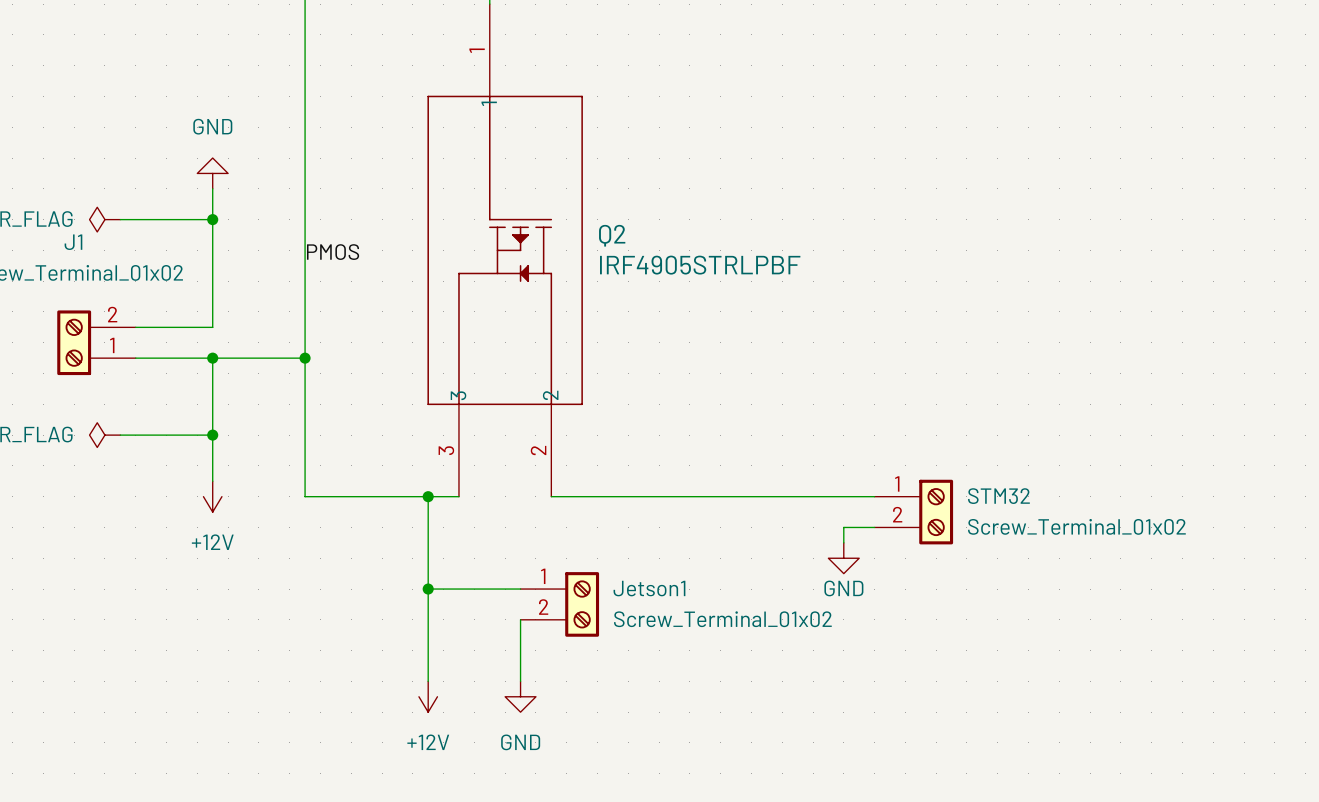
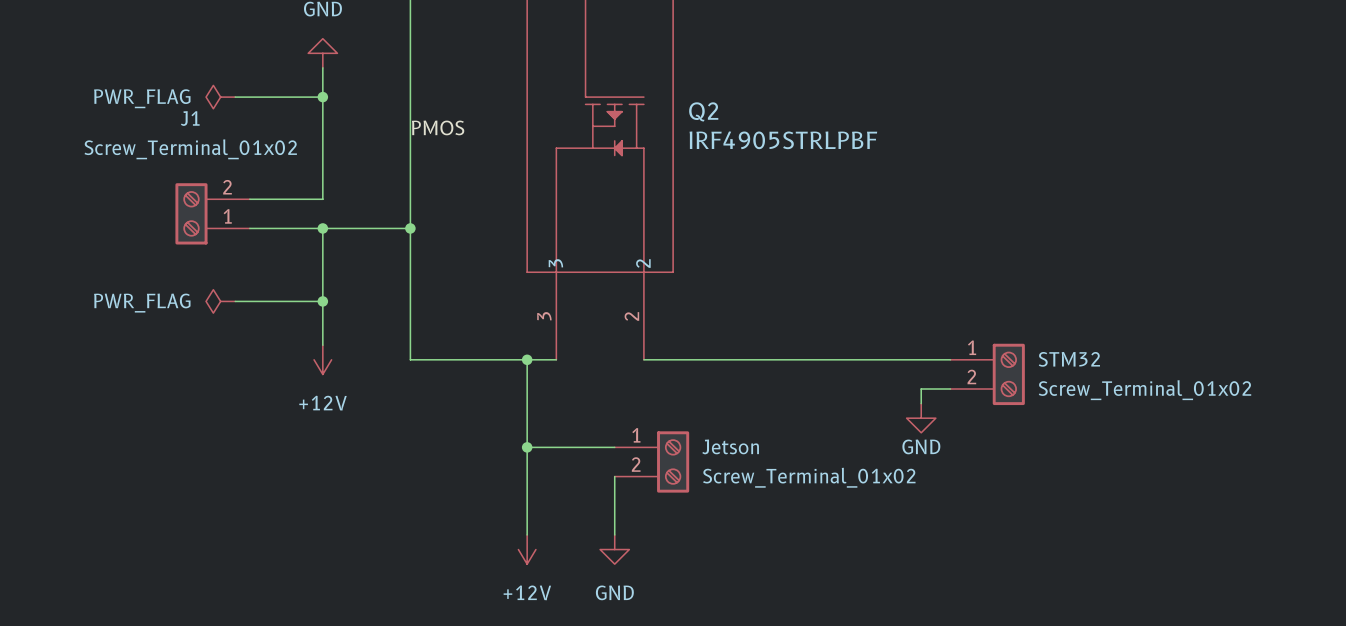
Jetson1 name: Jetson1 (649, 588) -> Jetson (730, 446)

